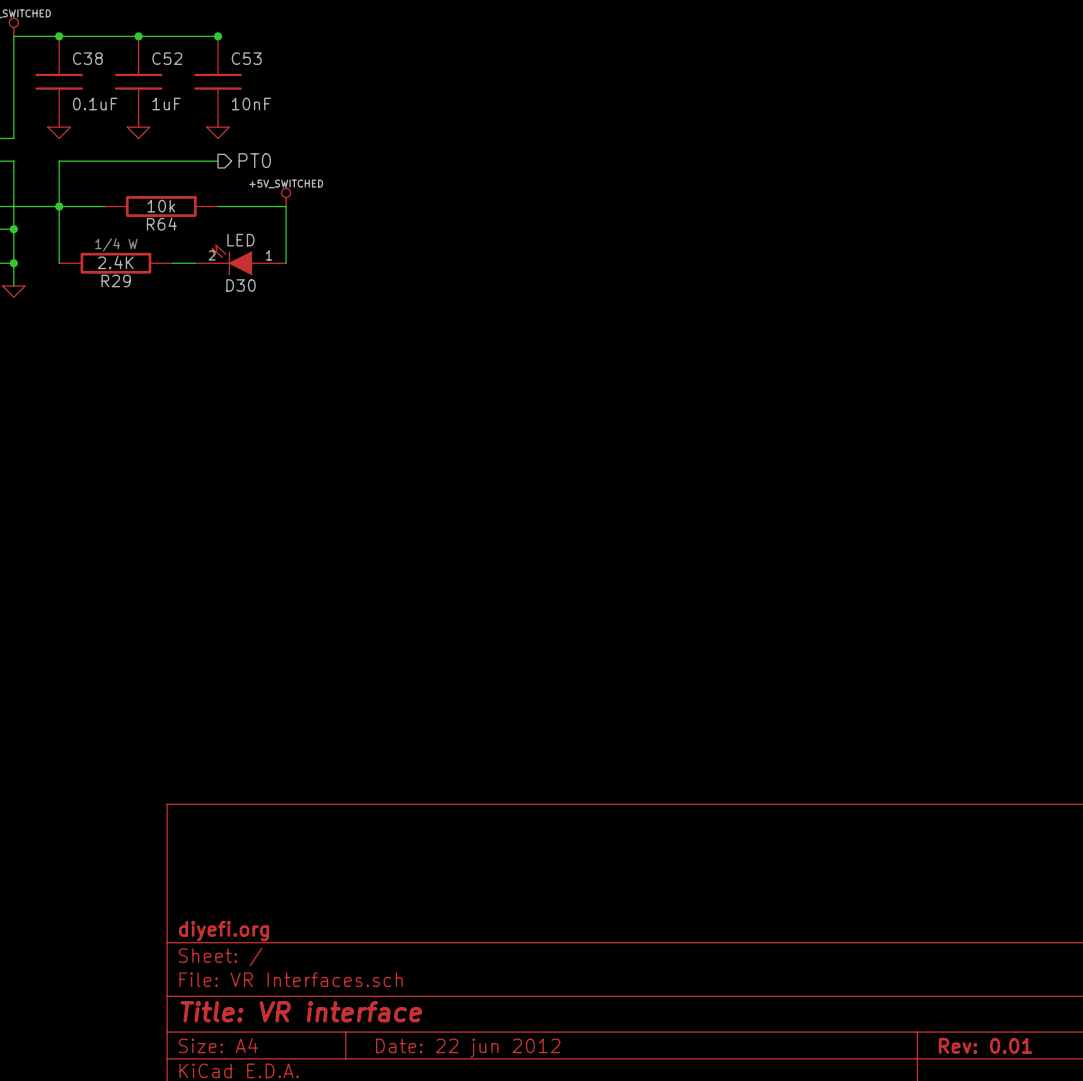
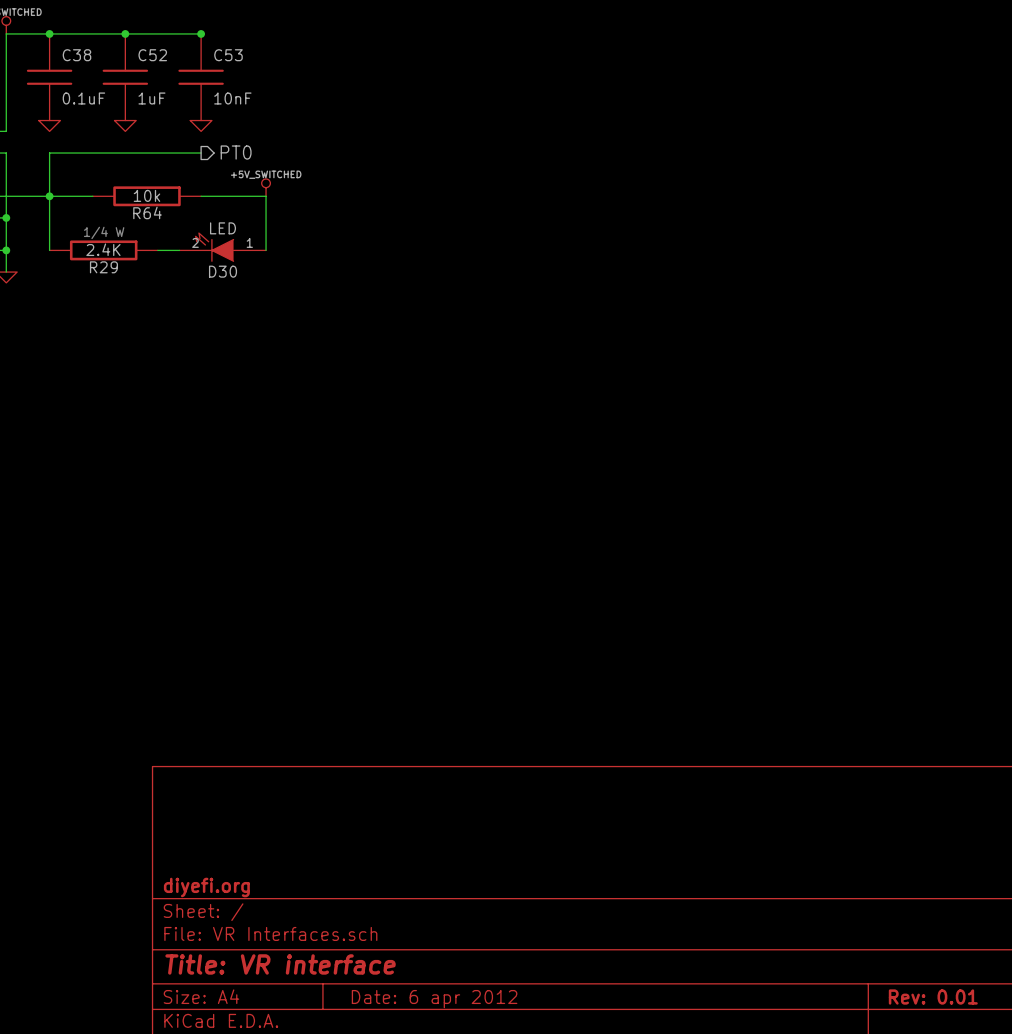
title block: Date: 22 jun 2012 (468, 1048) -> Date: 6 apr 2012 (434, 999)

